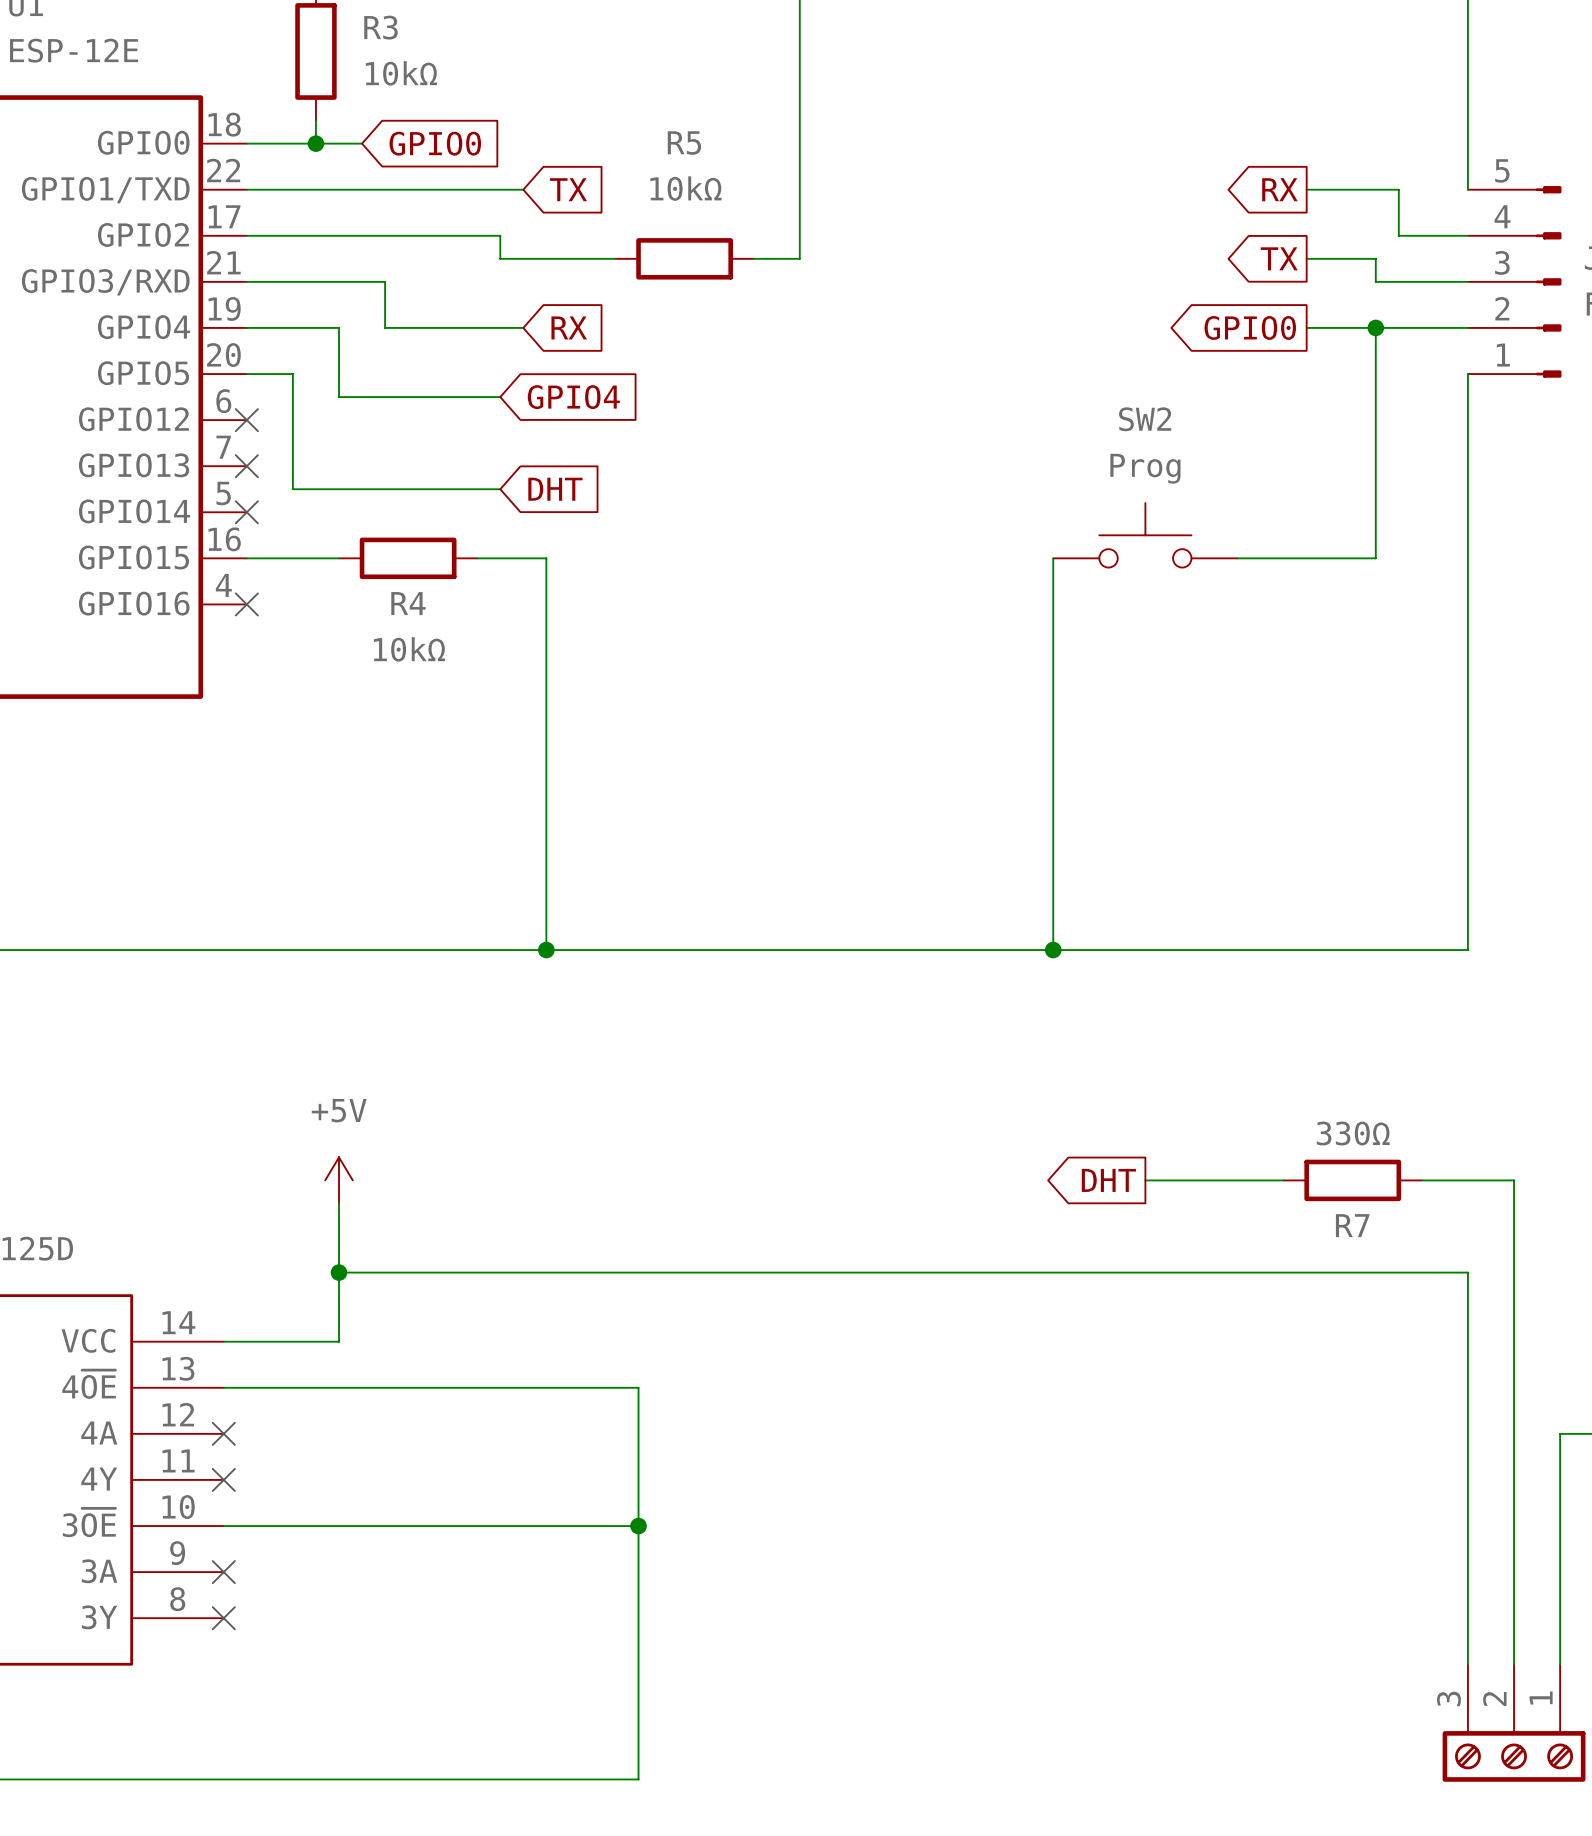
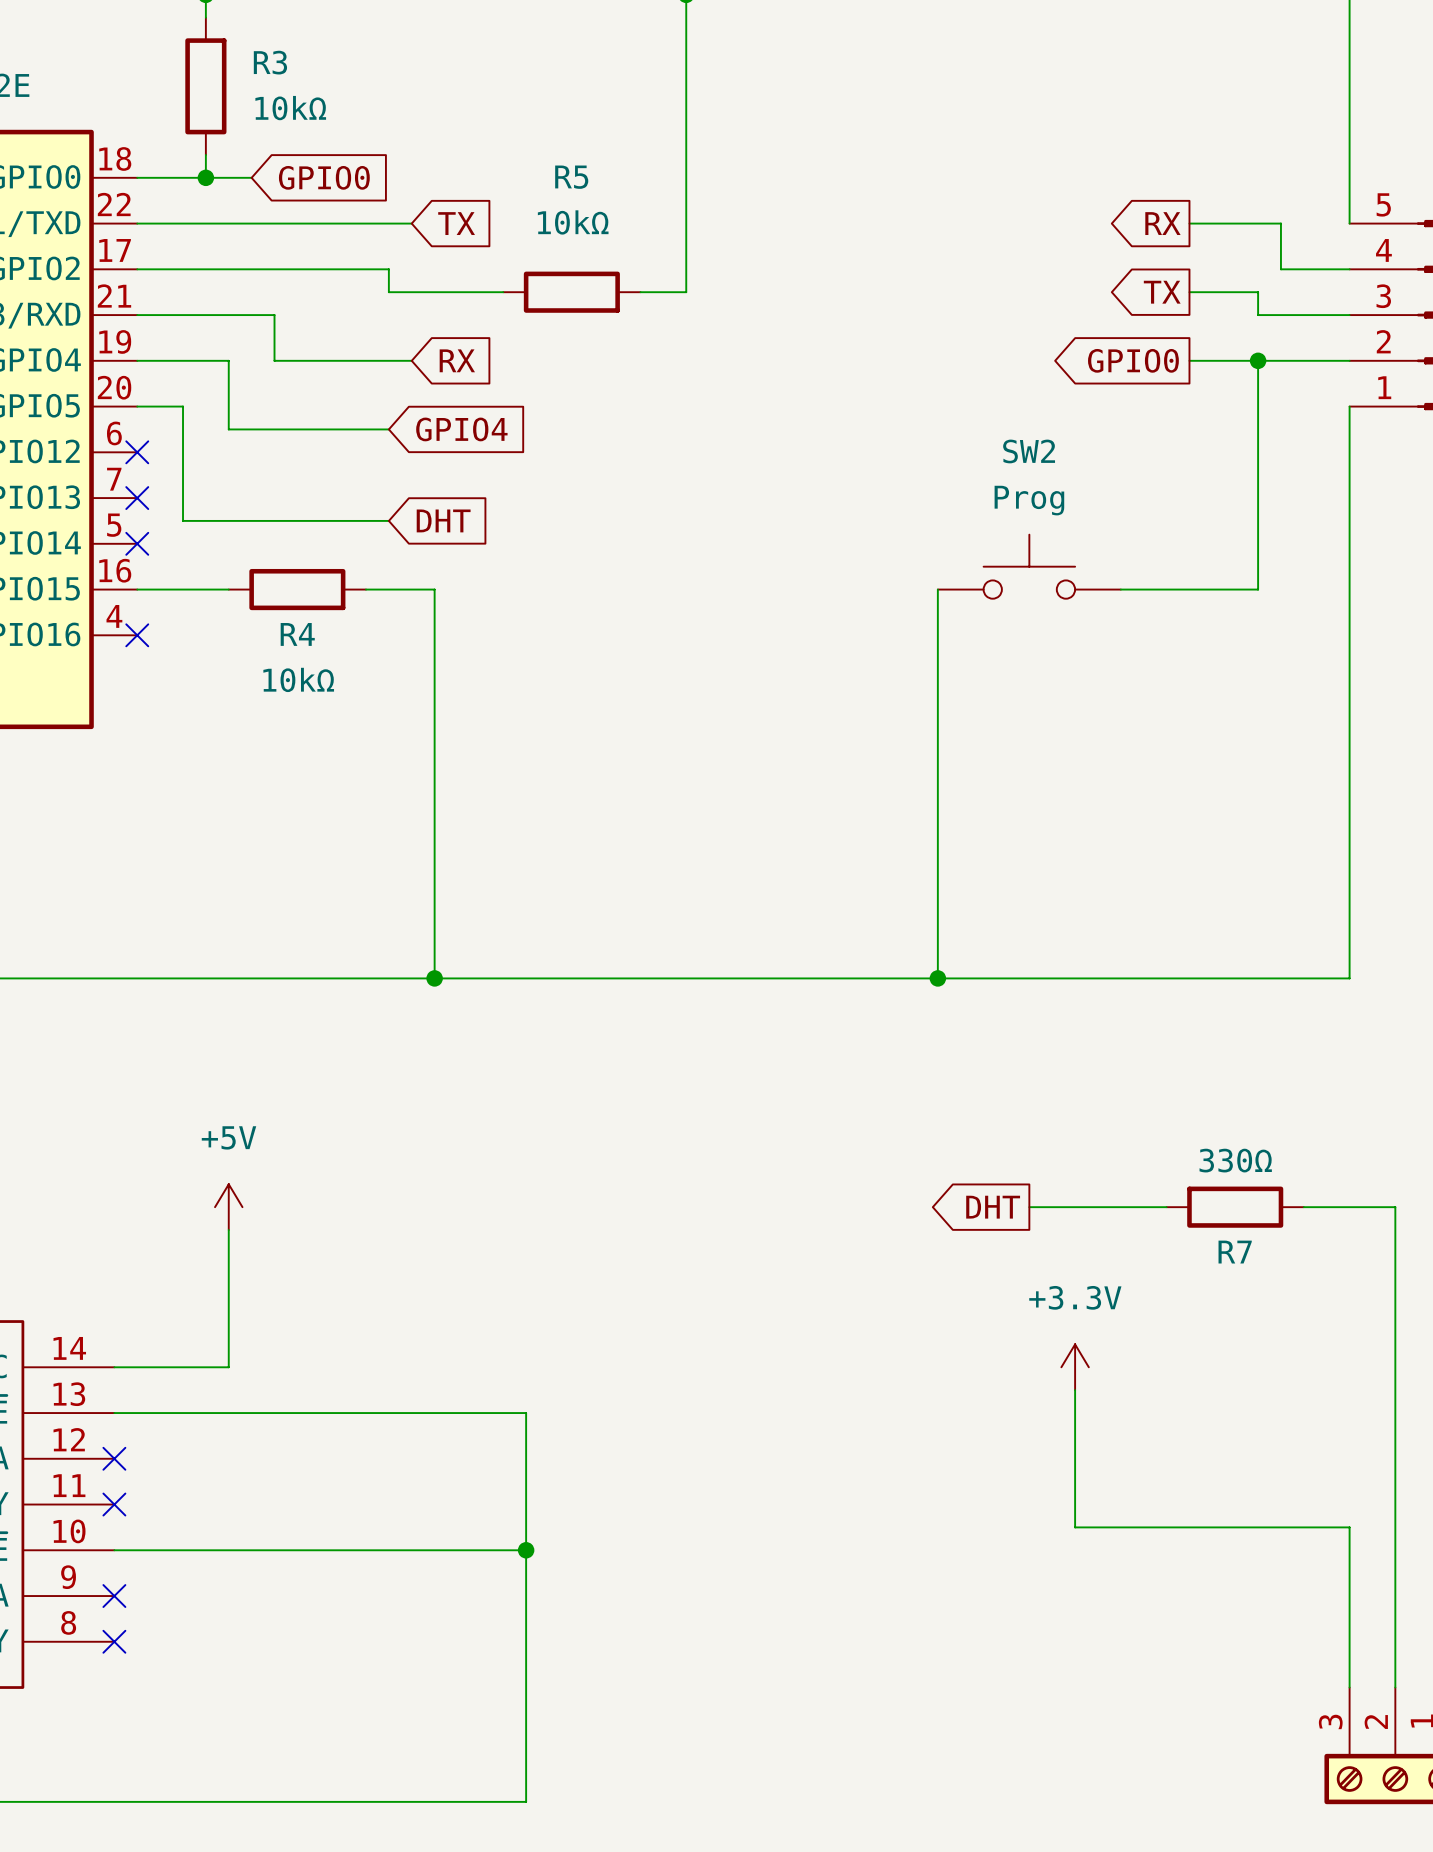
wire: (339, 1272) (1467, 1272) (1467, 1502) -> (1075, 1390) (1075, 1527) (1349, 1527)
junction: (339, 1272) -> none
power symbol: none -> +3.3V (1075, 1367)

